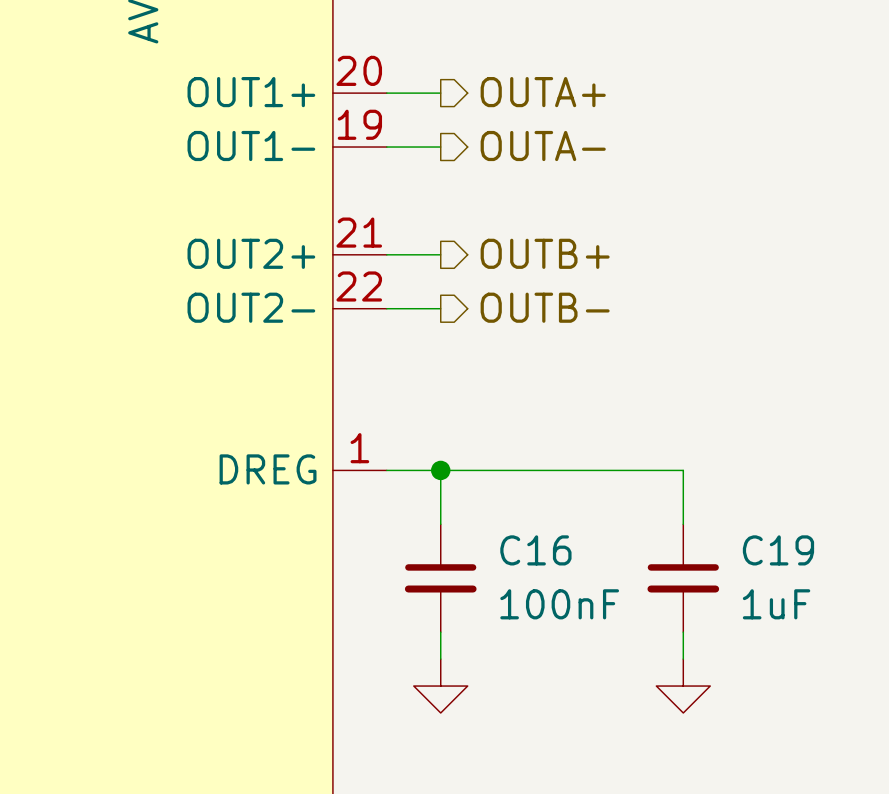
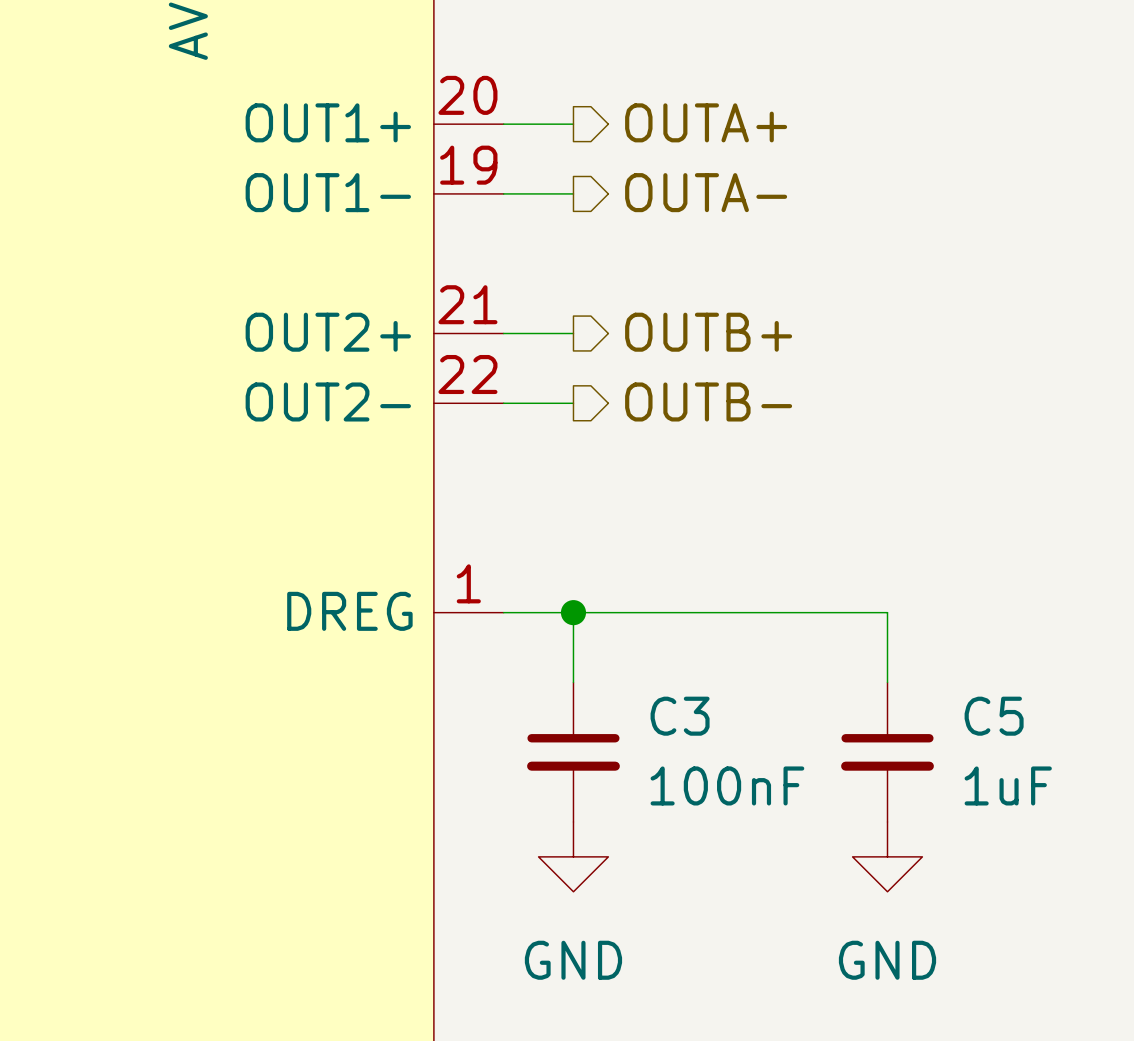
C16 name: C16 (535, 550) -> C3 (680, 716)
C19 name: C19 (778, 550) -> C5 (994, 716)
power symbol: none -> GND (573, 856)
power symbol: none -> GND (887, 856)
power symbol: (440, 686) -> none
power symbol: (683, 686) -> none

